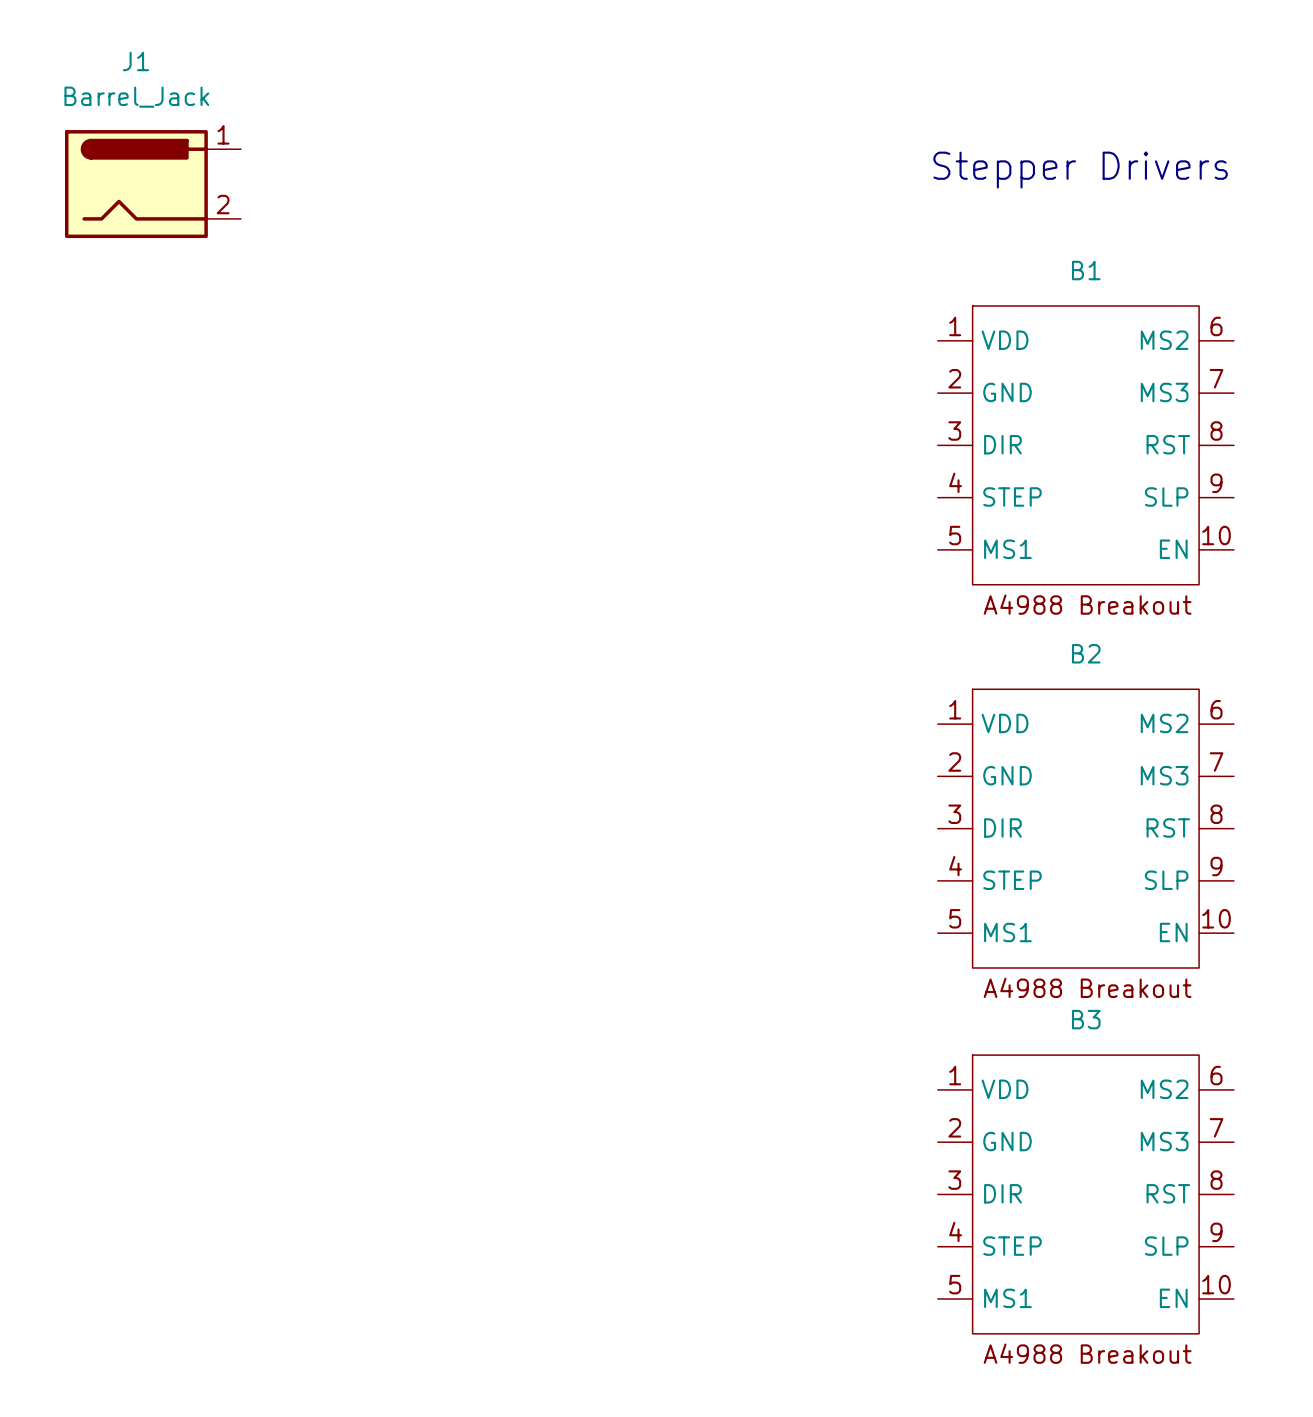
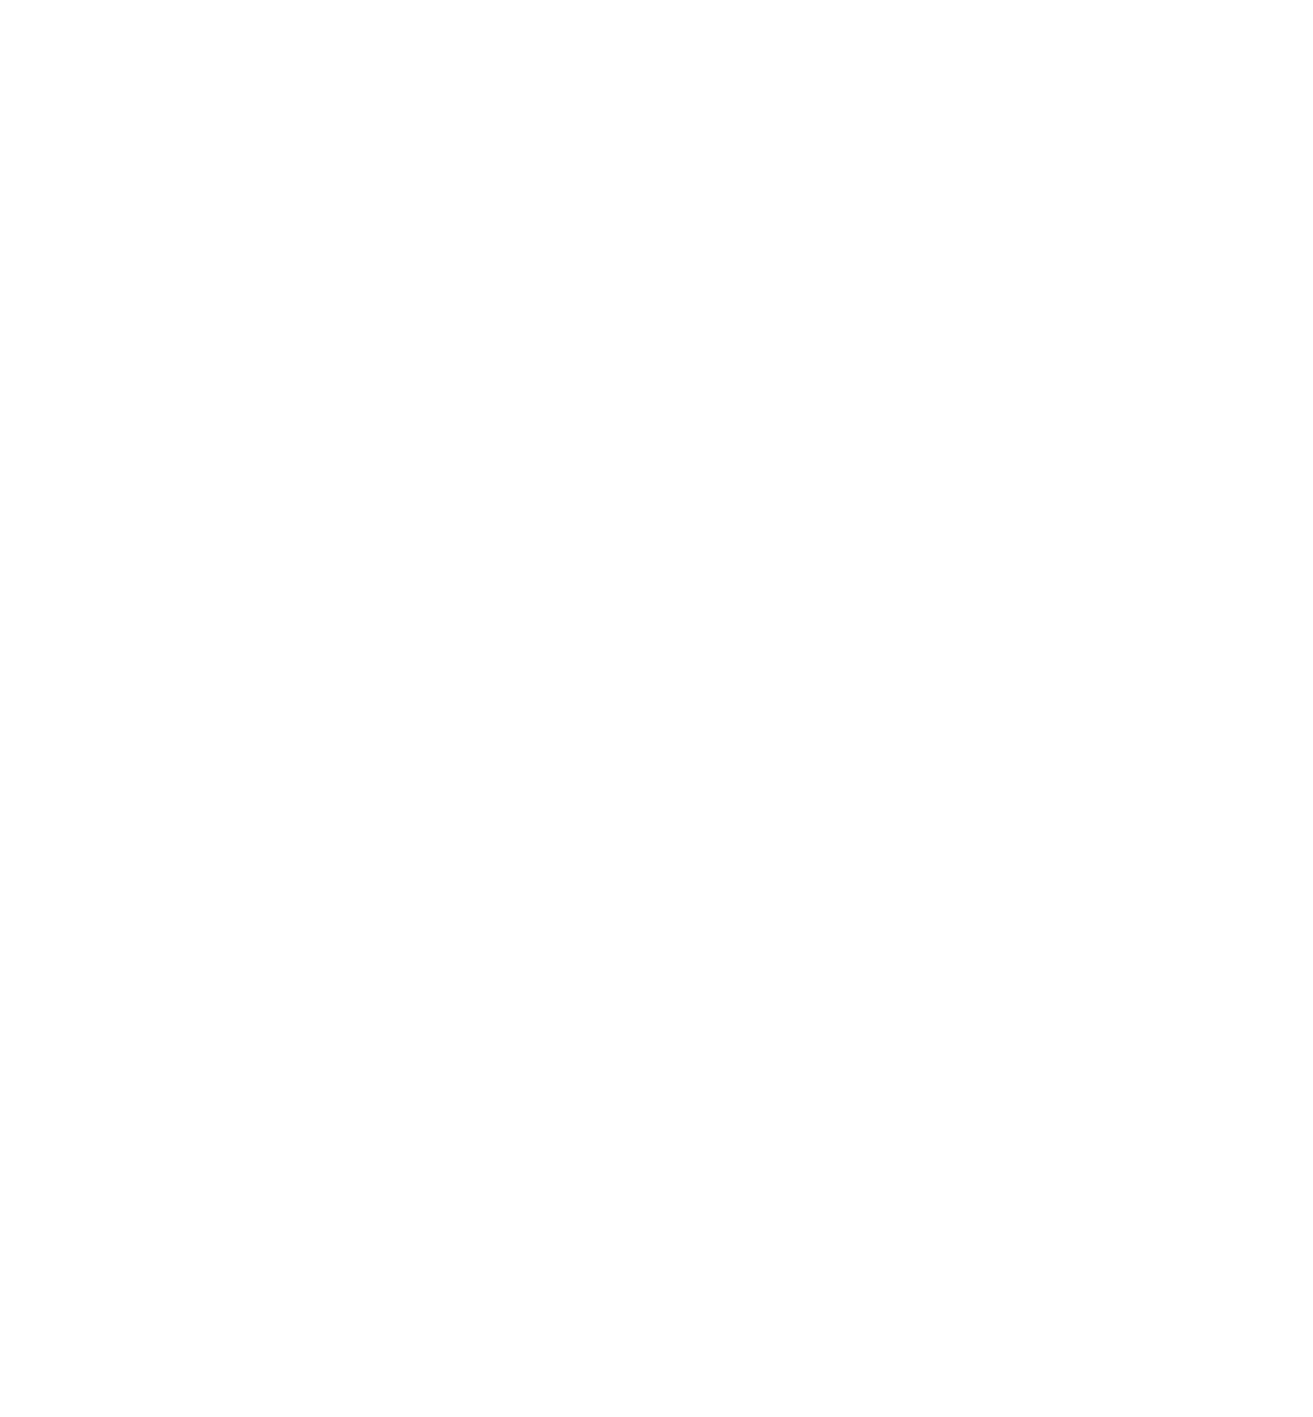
text: Stepper Drivers (1080, 170) -> none
J1: Barrel_Jack (152, 184) -> none
B1: (1085, 445) -> none
B2: (1085, 828) -> none
B3: (1085, 1194) -> none

